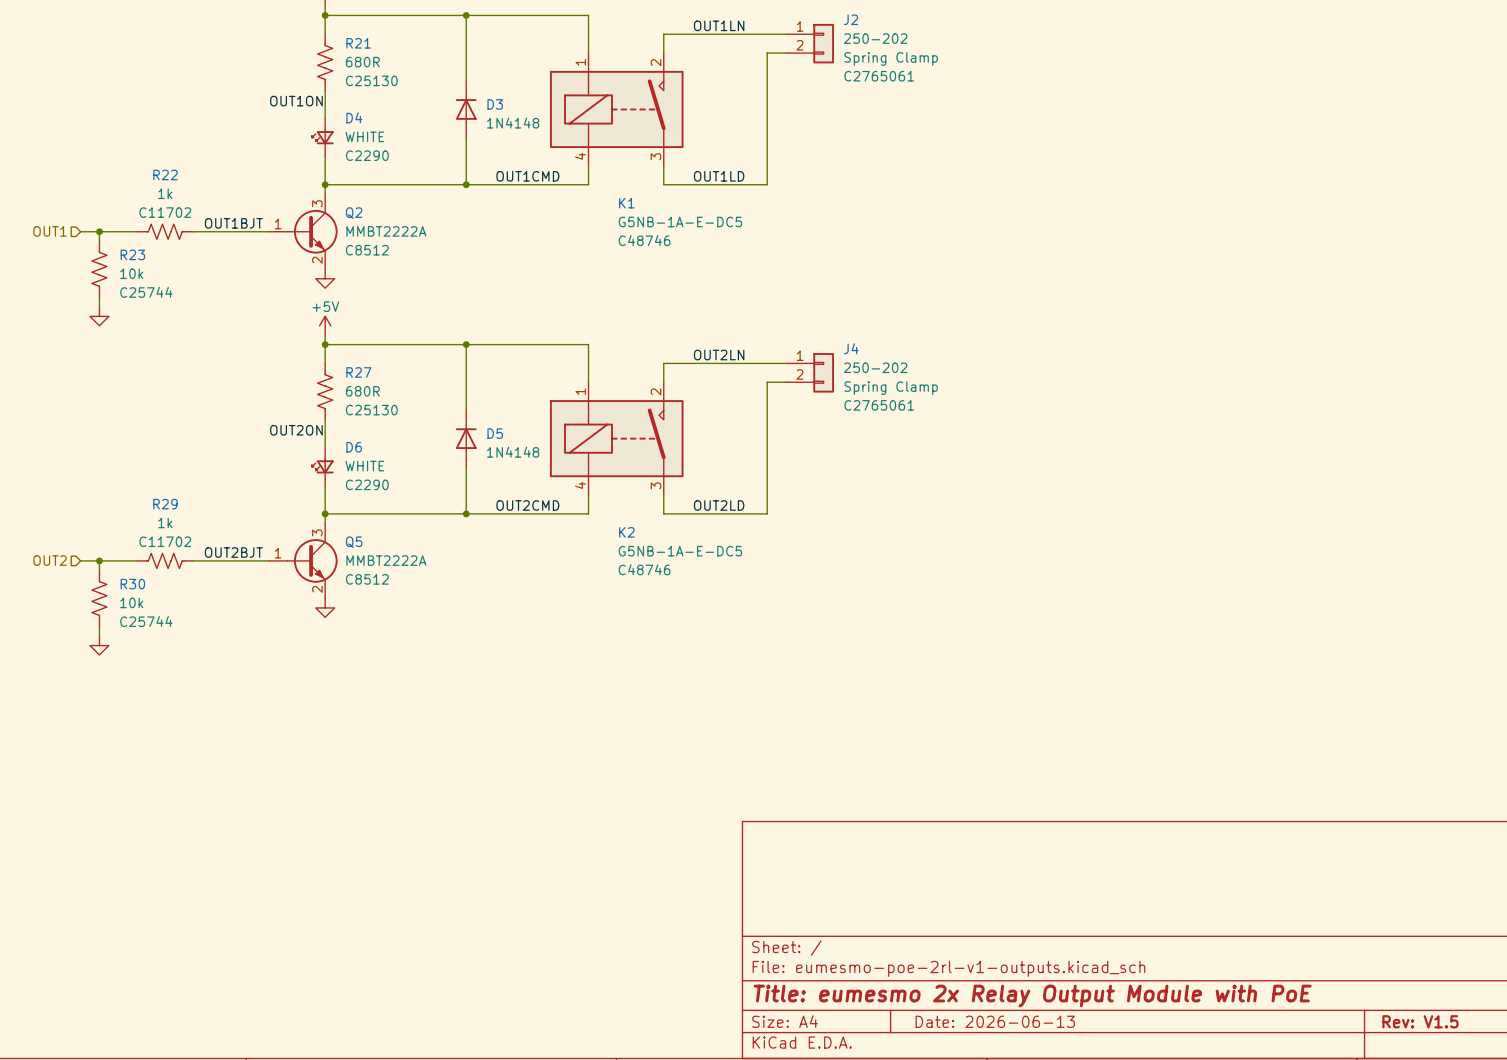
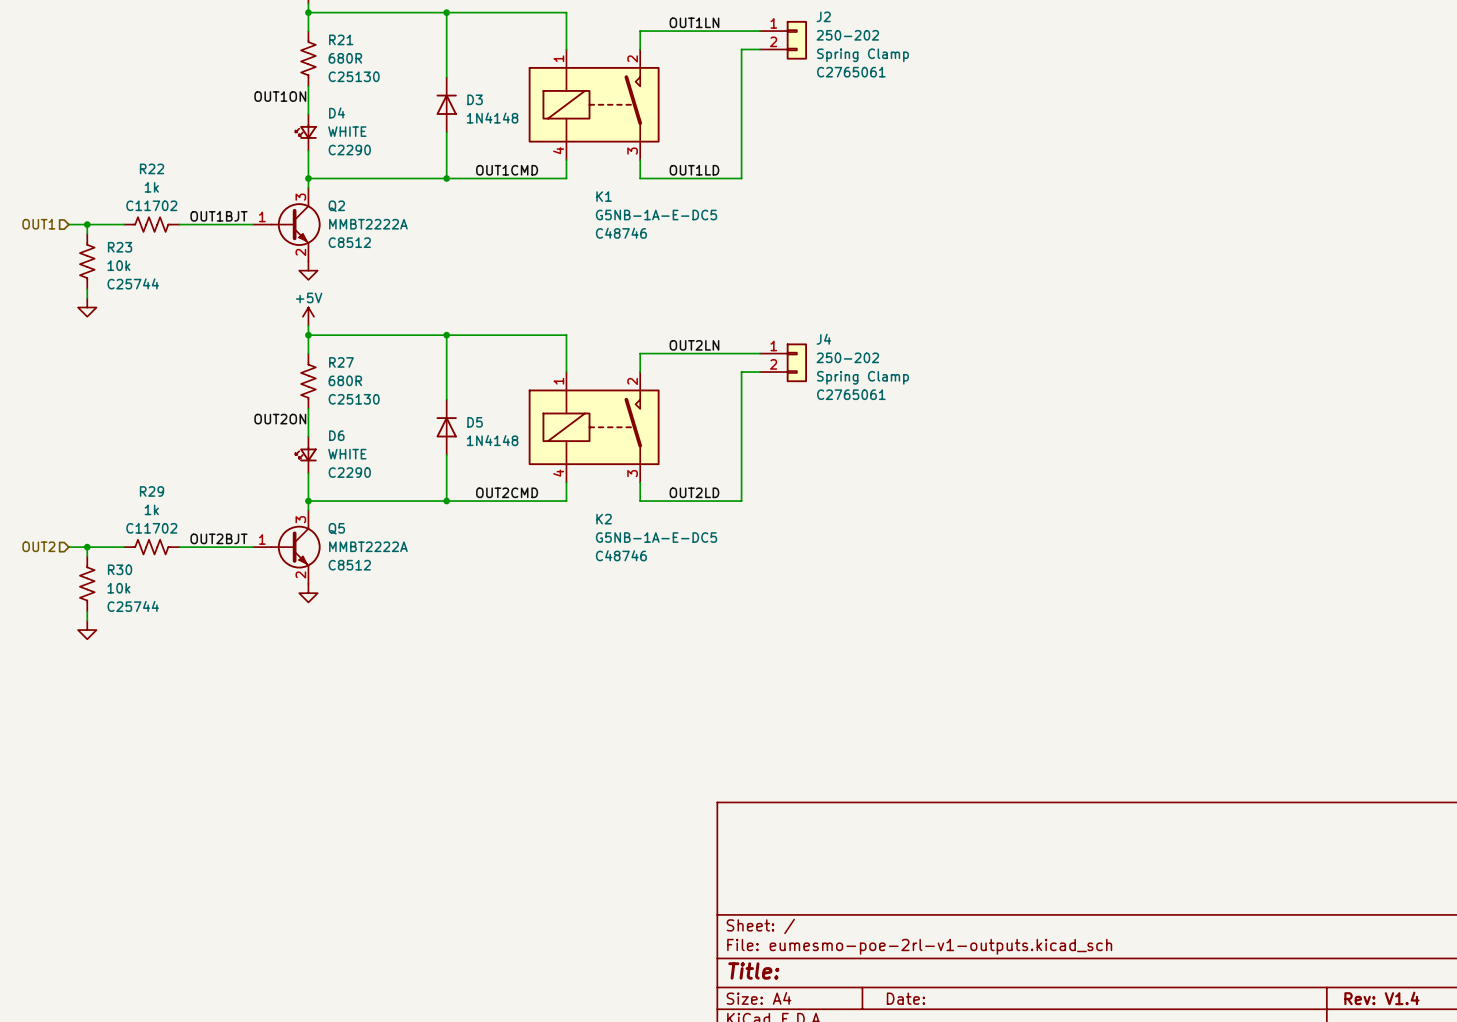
title block: Title: eumesmo 2x Relay Output Module with PoE (1032, 995) -> Title: (753, 970)
title block: Date: 2026-06-13 (995, 1021) -> Date: (905, 998)
title block: Rev: V1.5 (1420, 1021) -> Rev: V1.4 (1381, 998)

